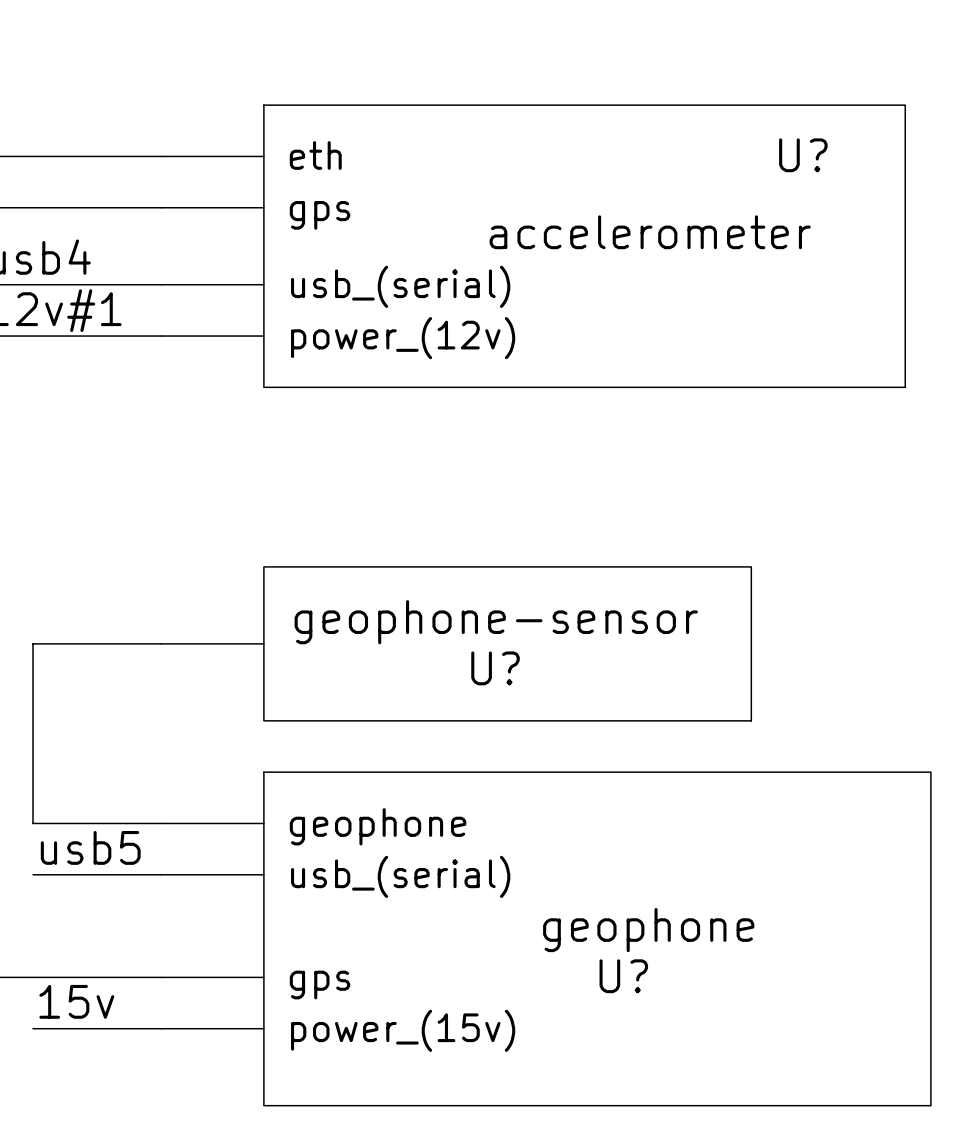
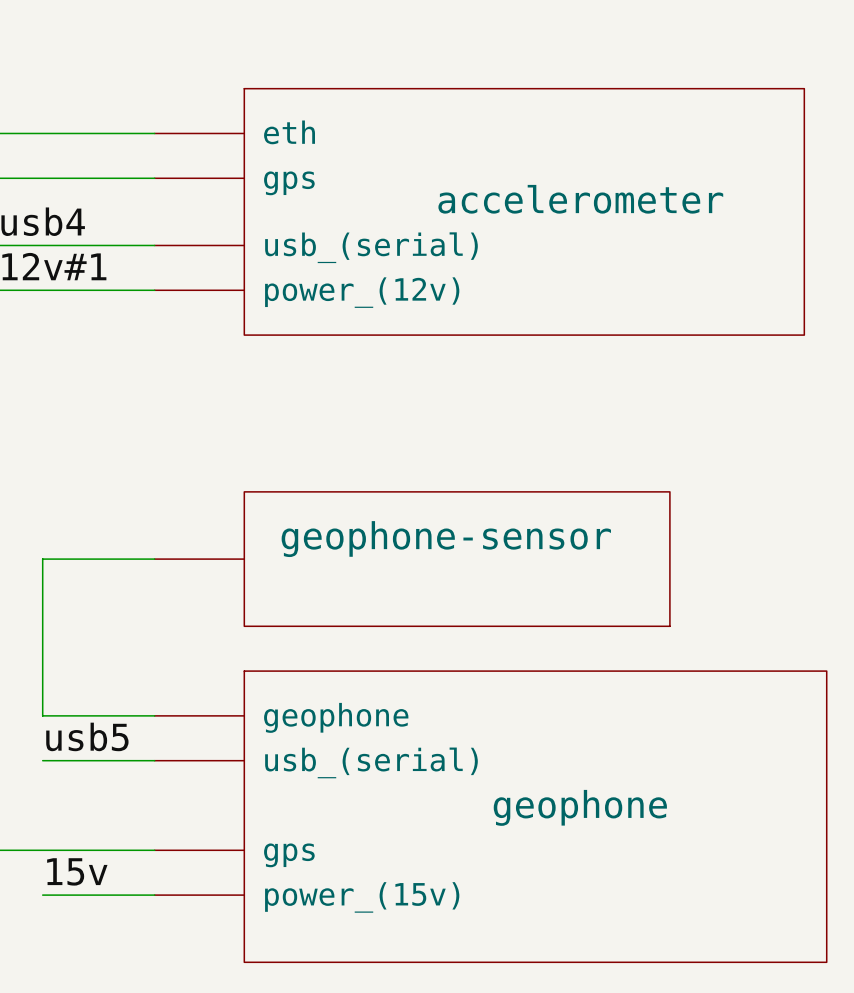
U? name: U? (803, 155) -> none
U? name: U? (495, 668) -> none
U? name: U? (623, 976) -> none

